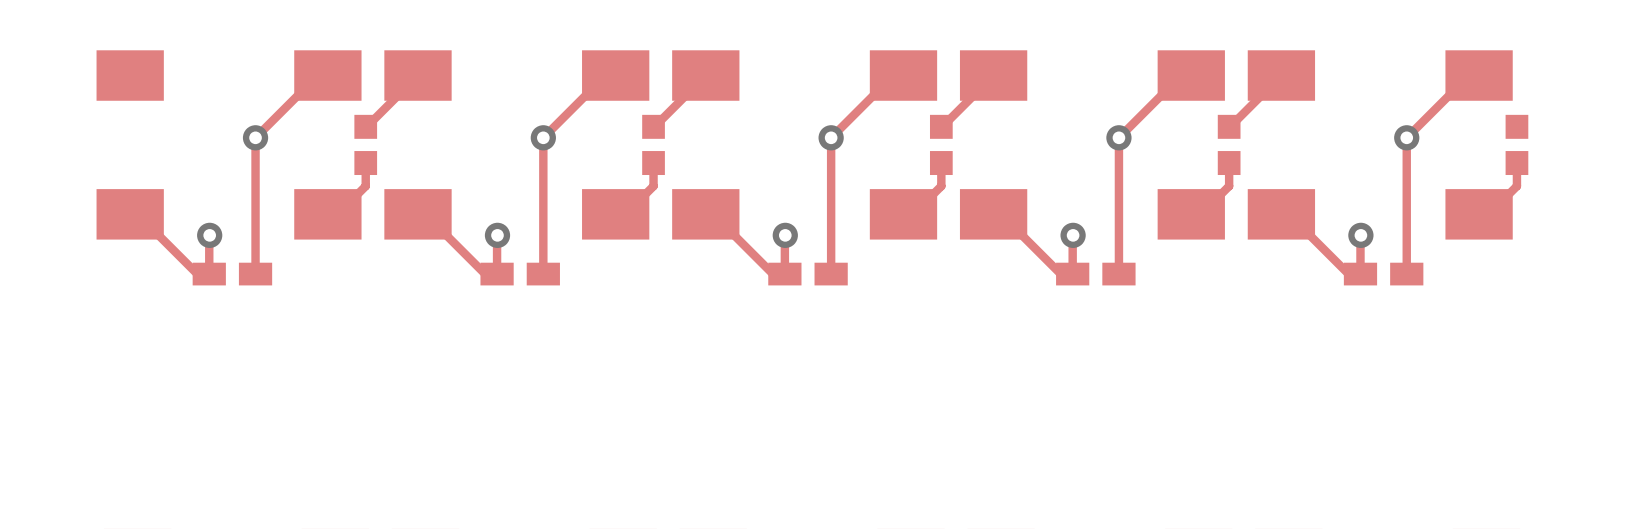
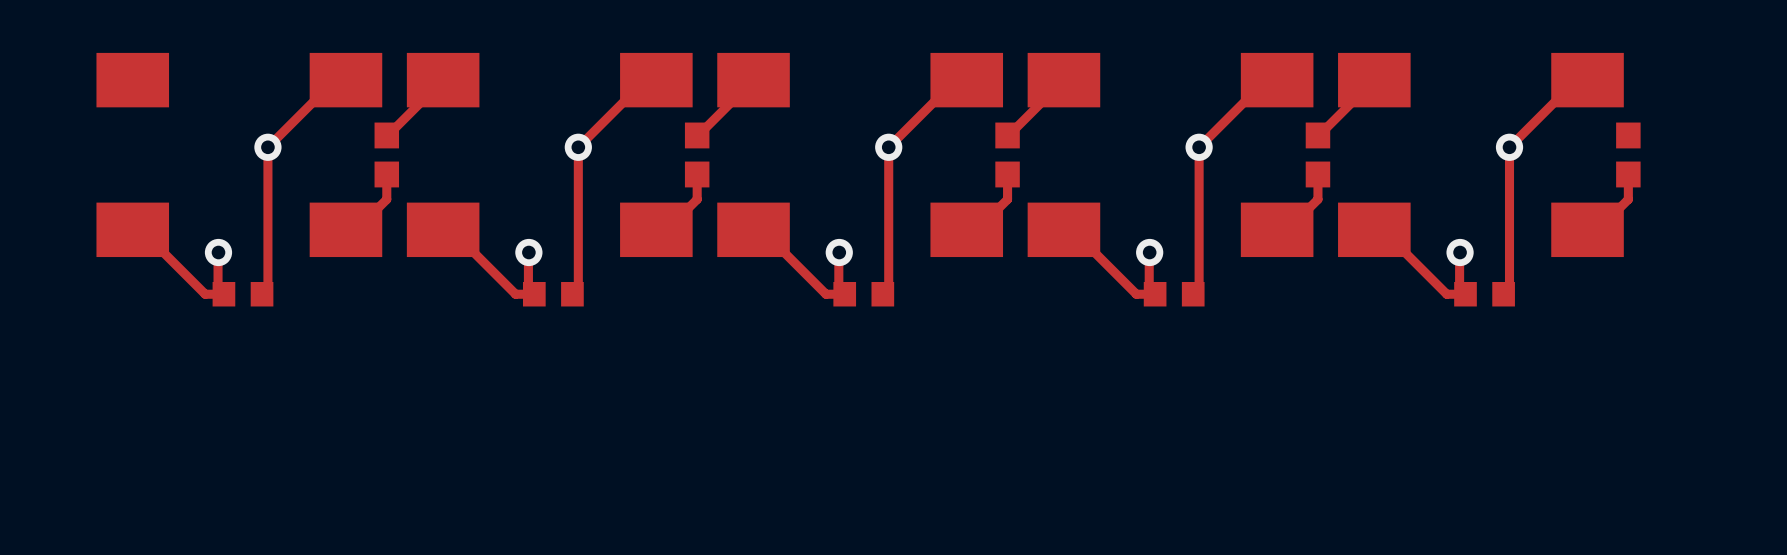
part footprint: [192, 262, 273, 286] -> [212, 281, 274, 307]
part footprint: [480, 262, 560, 286] -> [522, 281, 584, 307]
part footprint: [768, 262, 848, 286] -> [833, 281, 895, 307]
part footprint: [1056, 262, 1136, 286] -> [1143, 281, 1205, 307]
part footprint: [1343, 262, 1424, 286] -> [1454, 281, 1515, 307]

